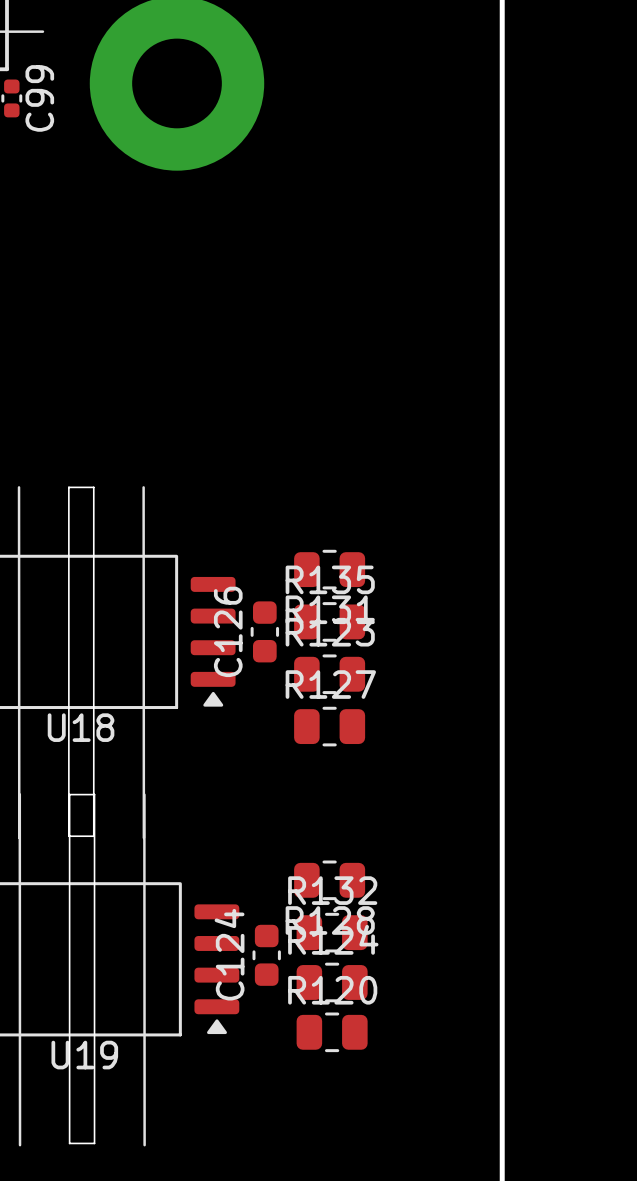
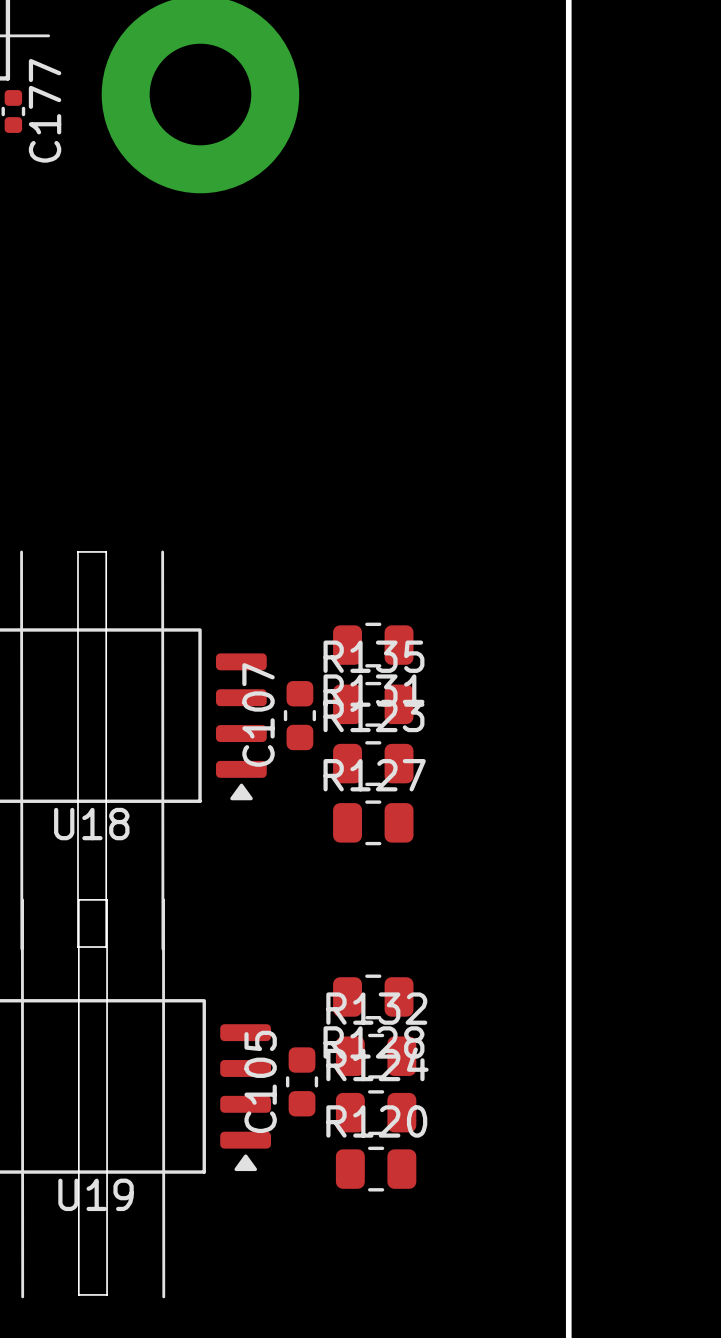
C99 name: C99 (39, 98) -> C177 (45, 110)
C126 name: C126 (228, 631) -> C107 (258, 714)
C124 name: C124 (229, 954) -> C105 (260, 1081)

